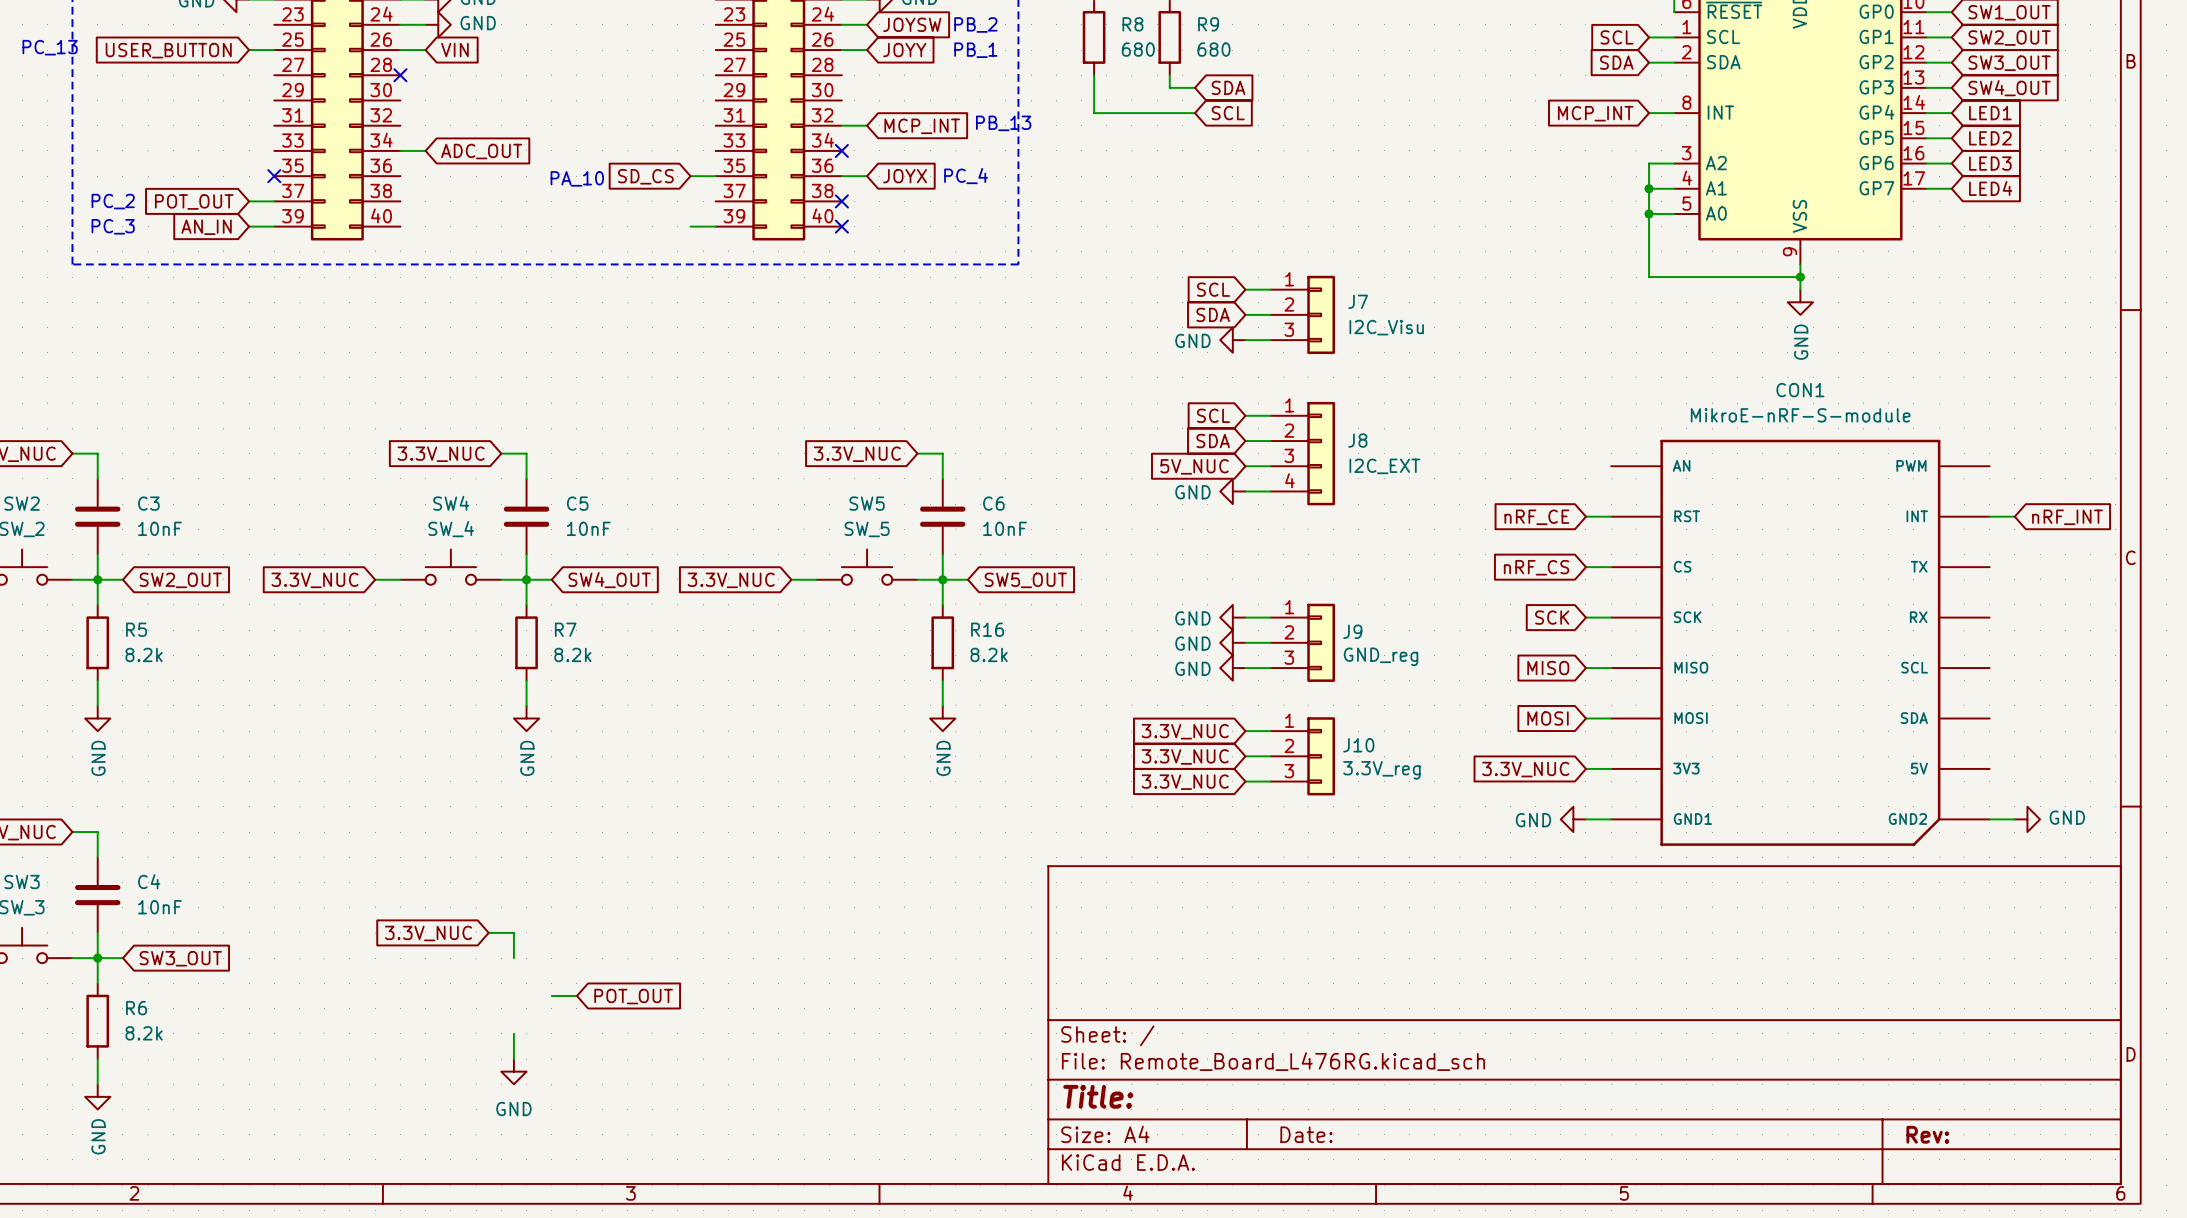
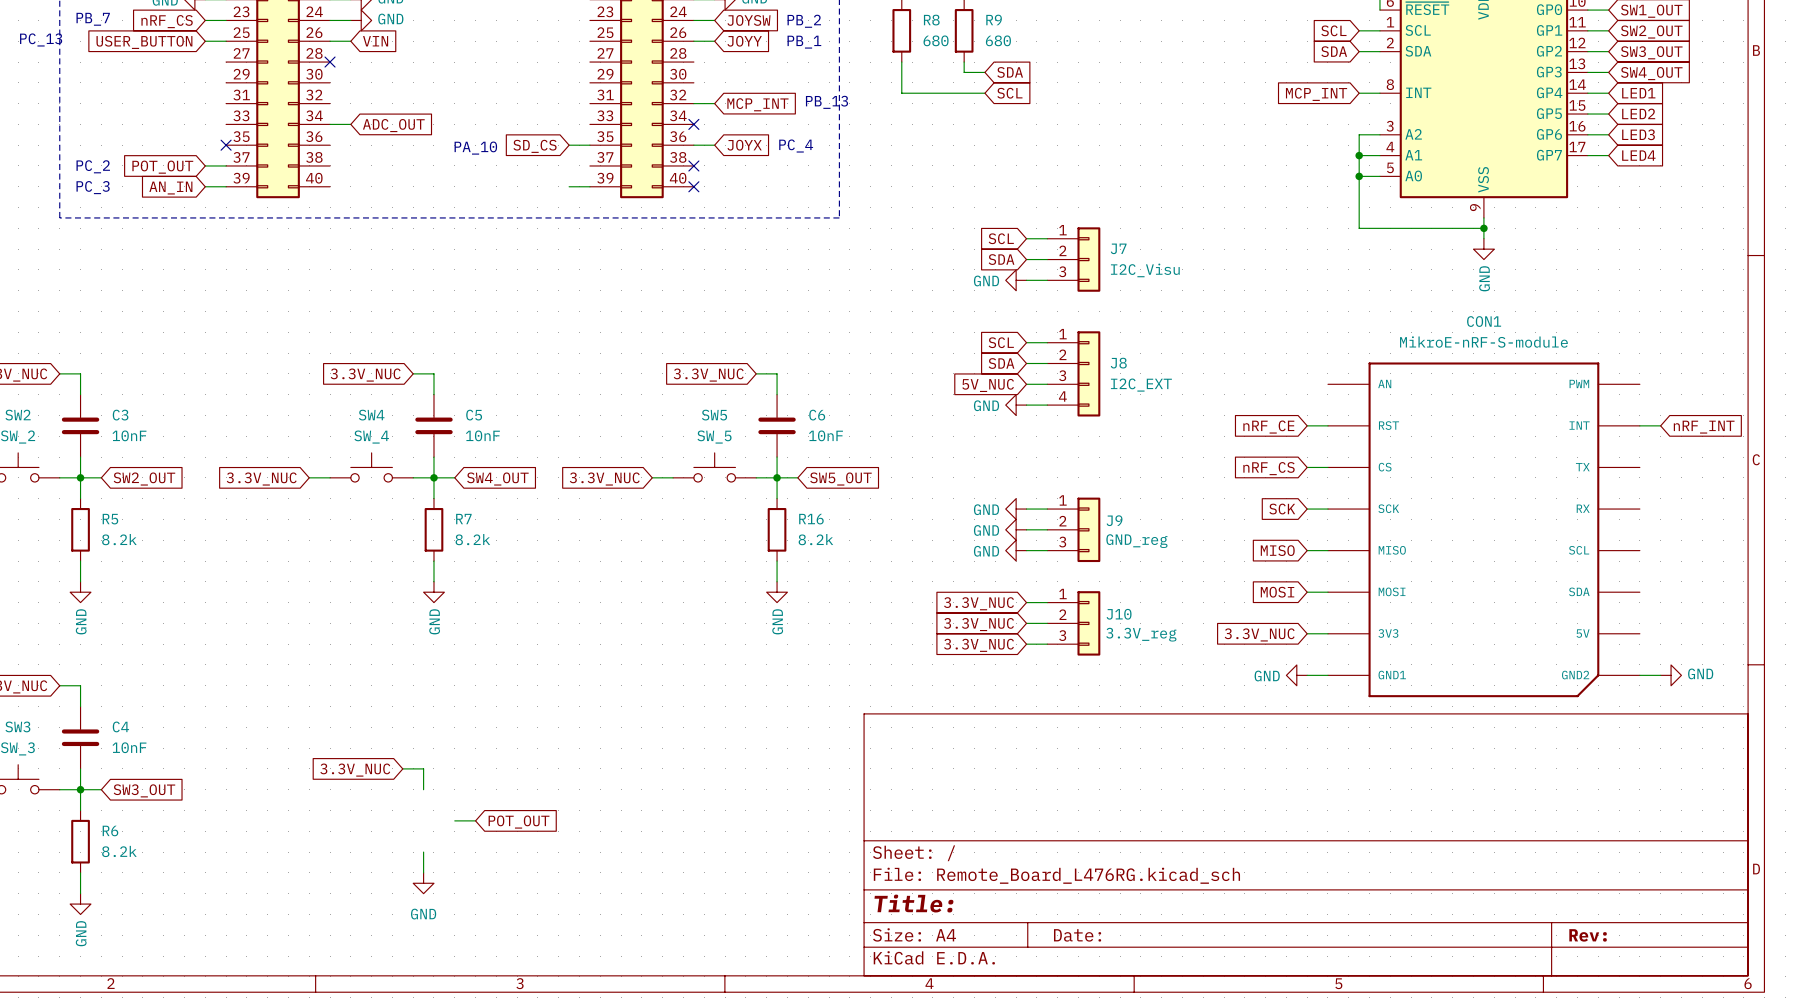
text: none -> PB_7 (93, 19)
wire: none -> (205, 20) (226, 20)
global label: none -> nRF_CS (167, 21)

